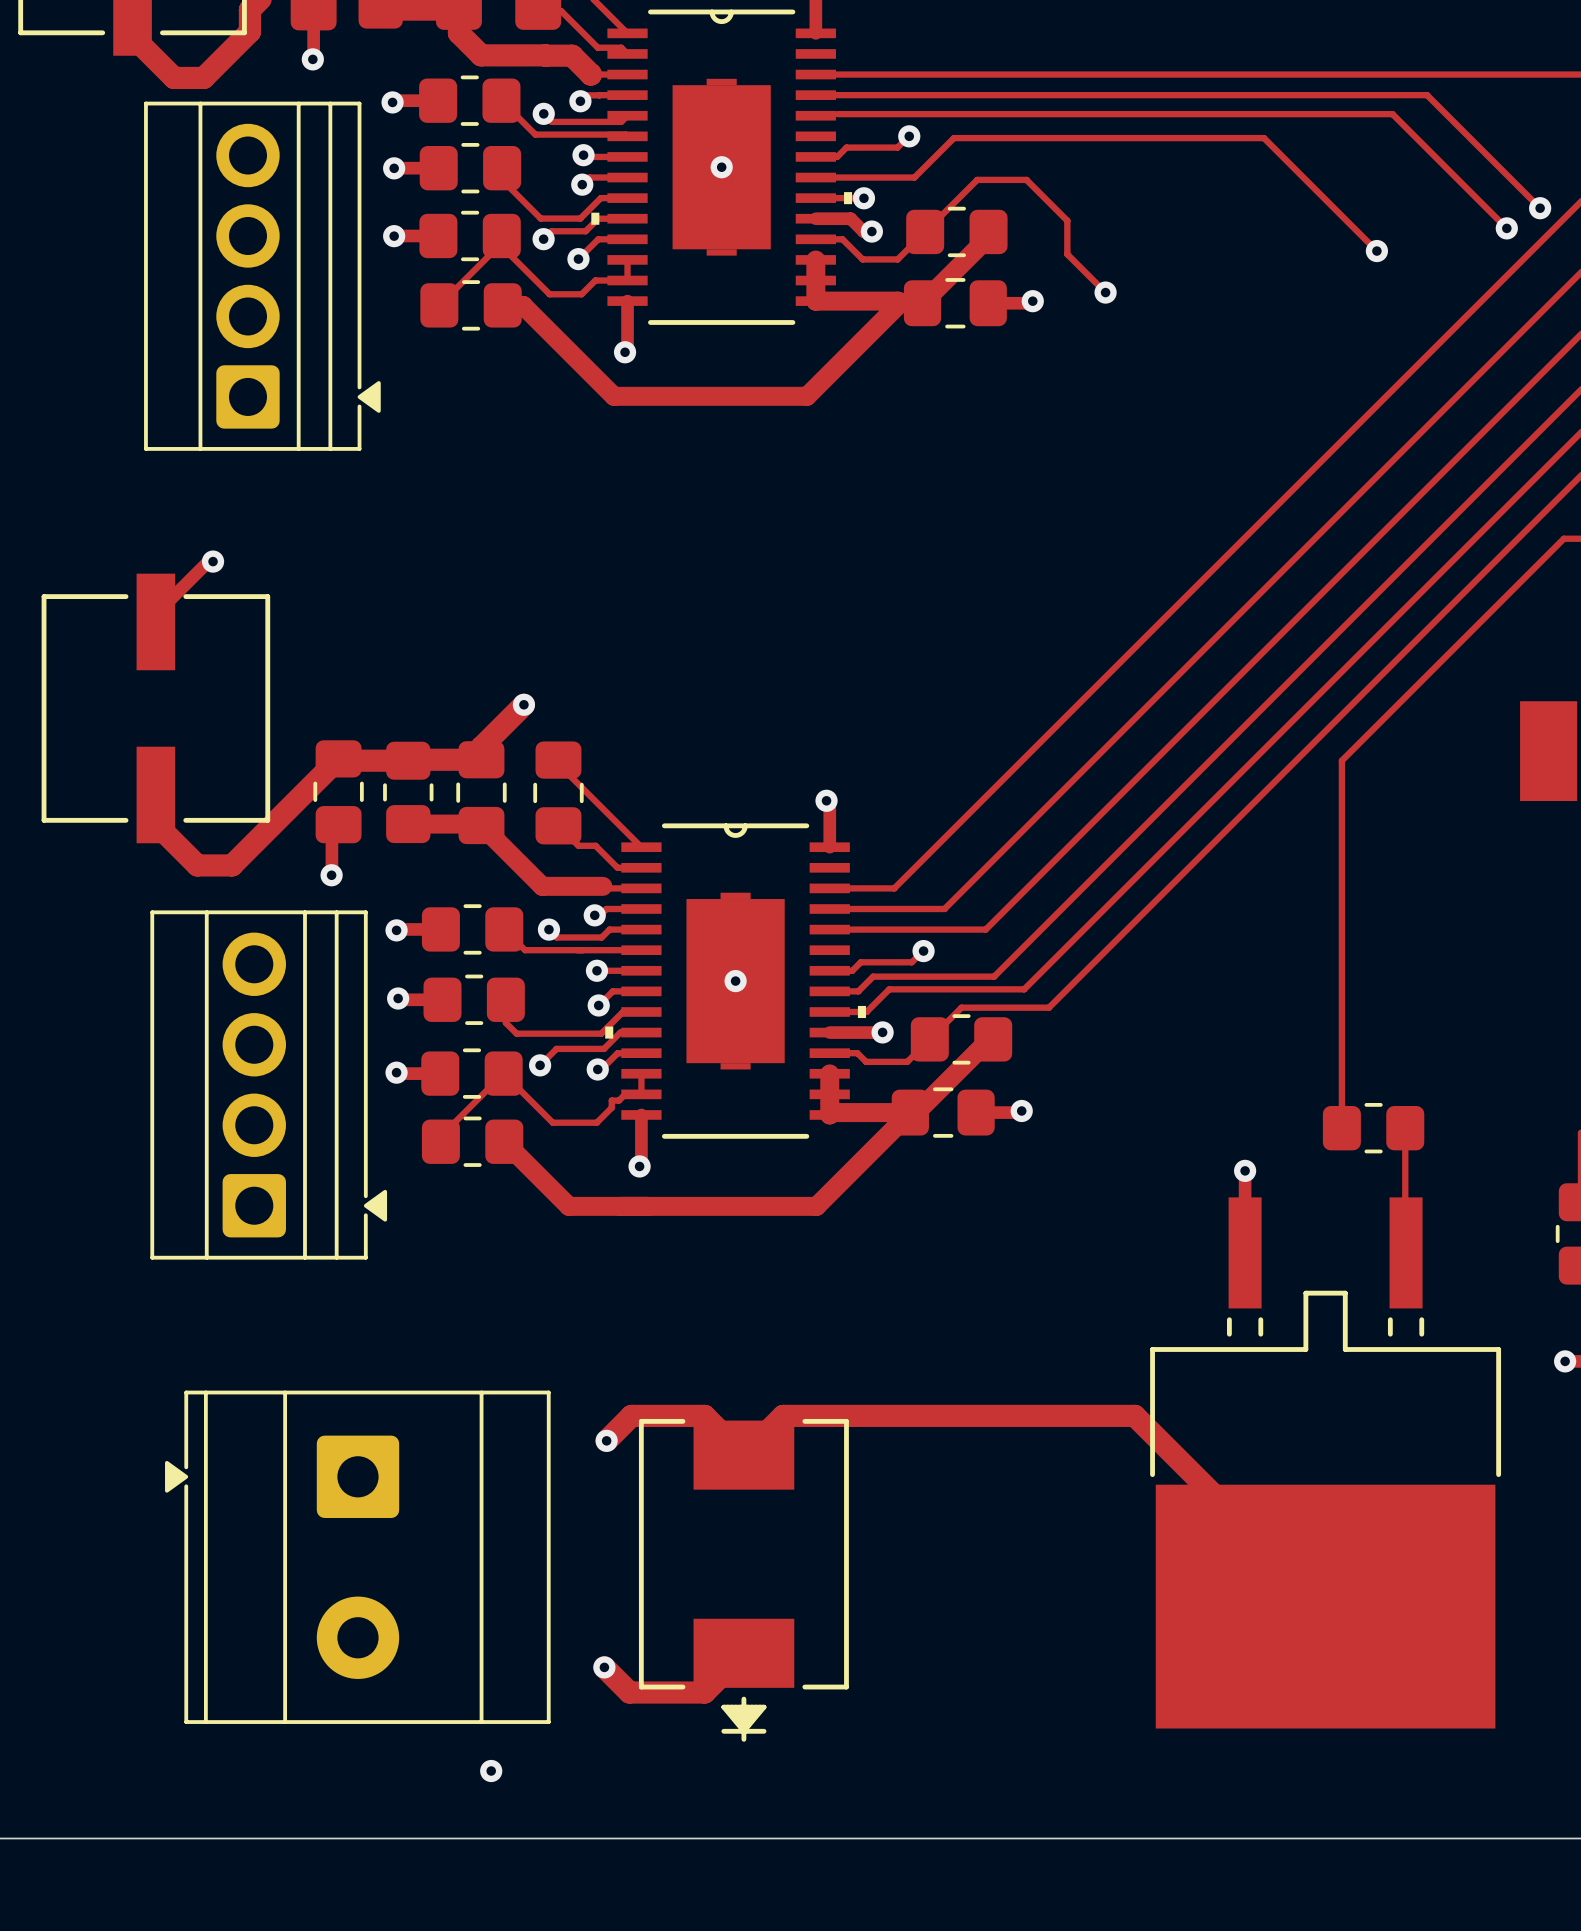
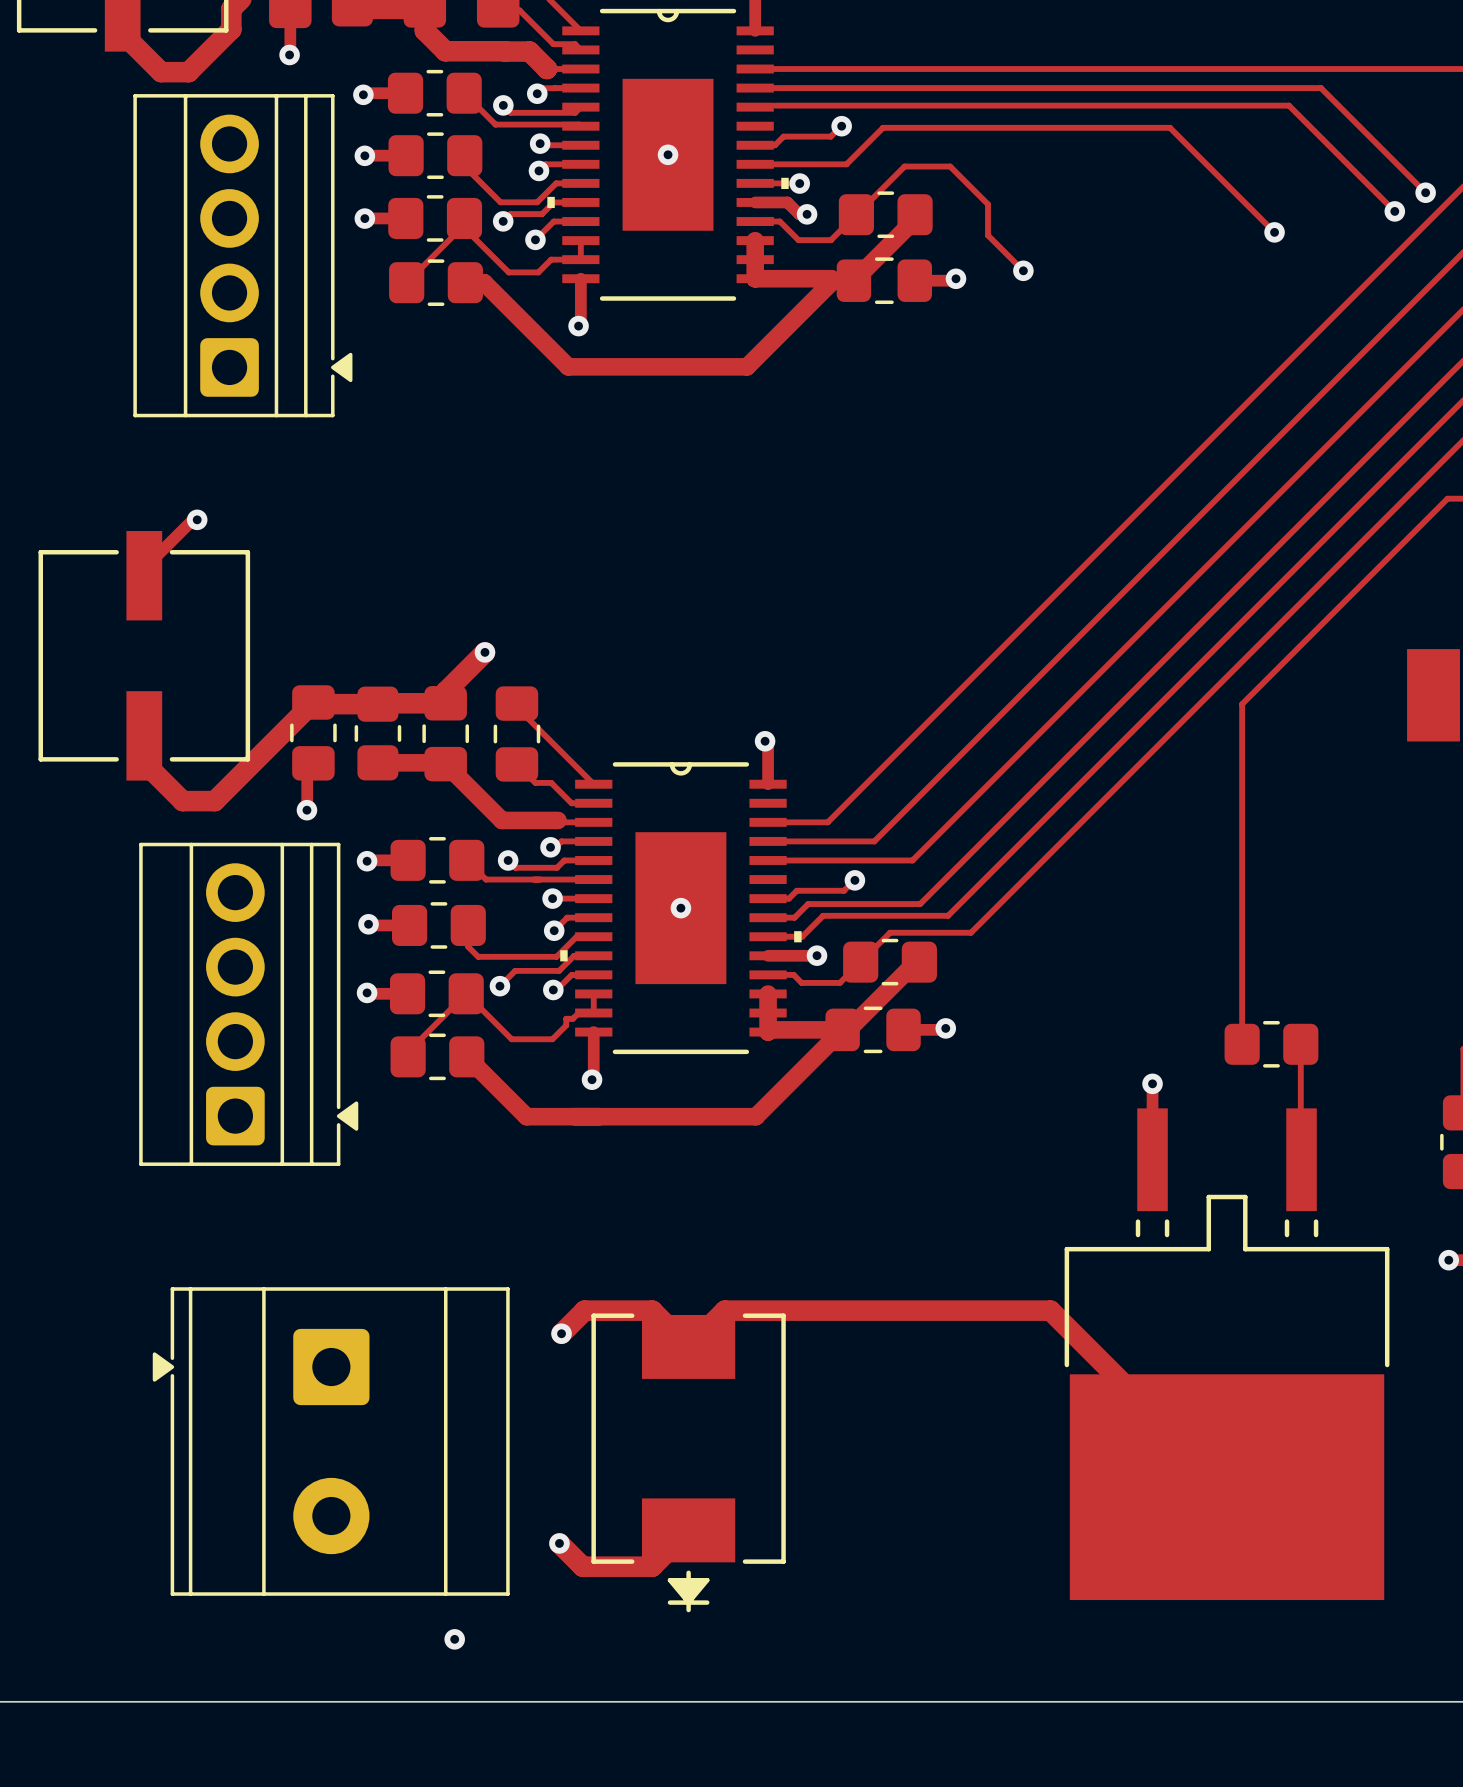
part footprint: [591, 9, 853, 325] -> [547, 8, 789, 301]
part footprint: [605, 823, 866, 1139] -> [560, 762, 802, 1055]

